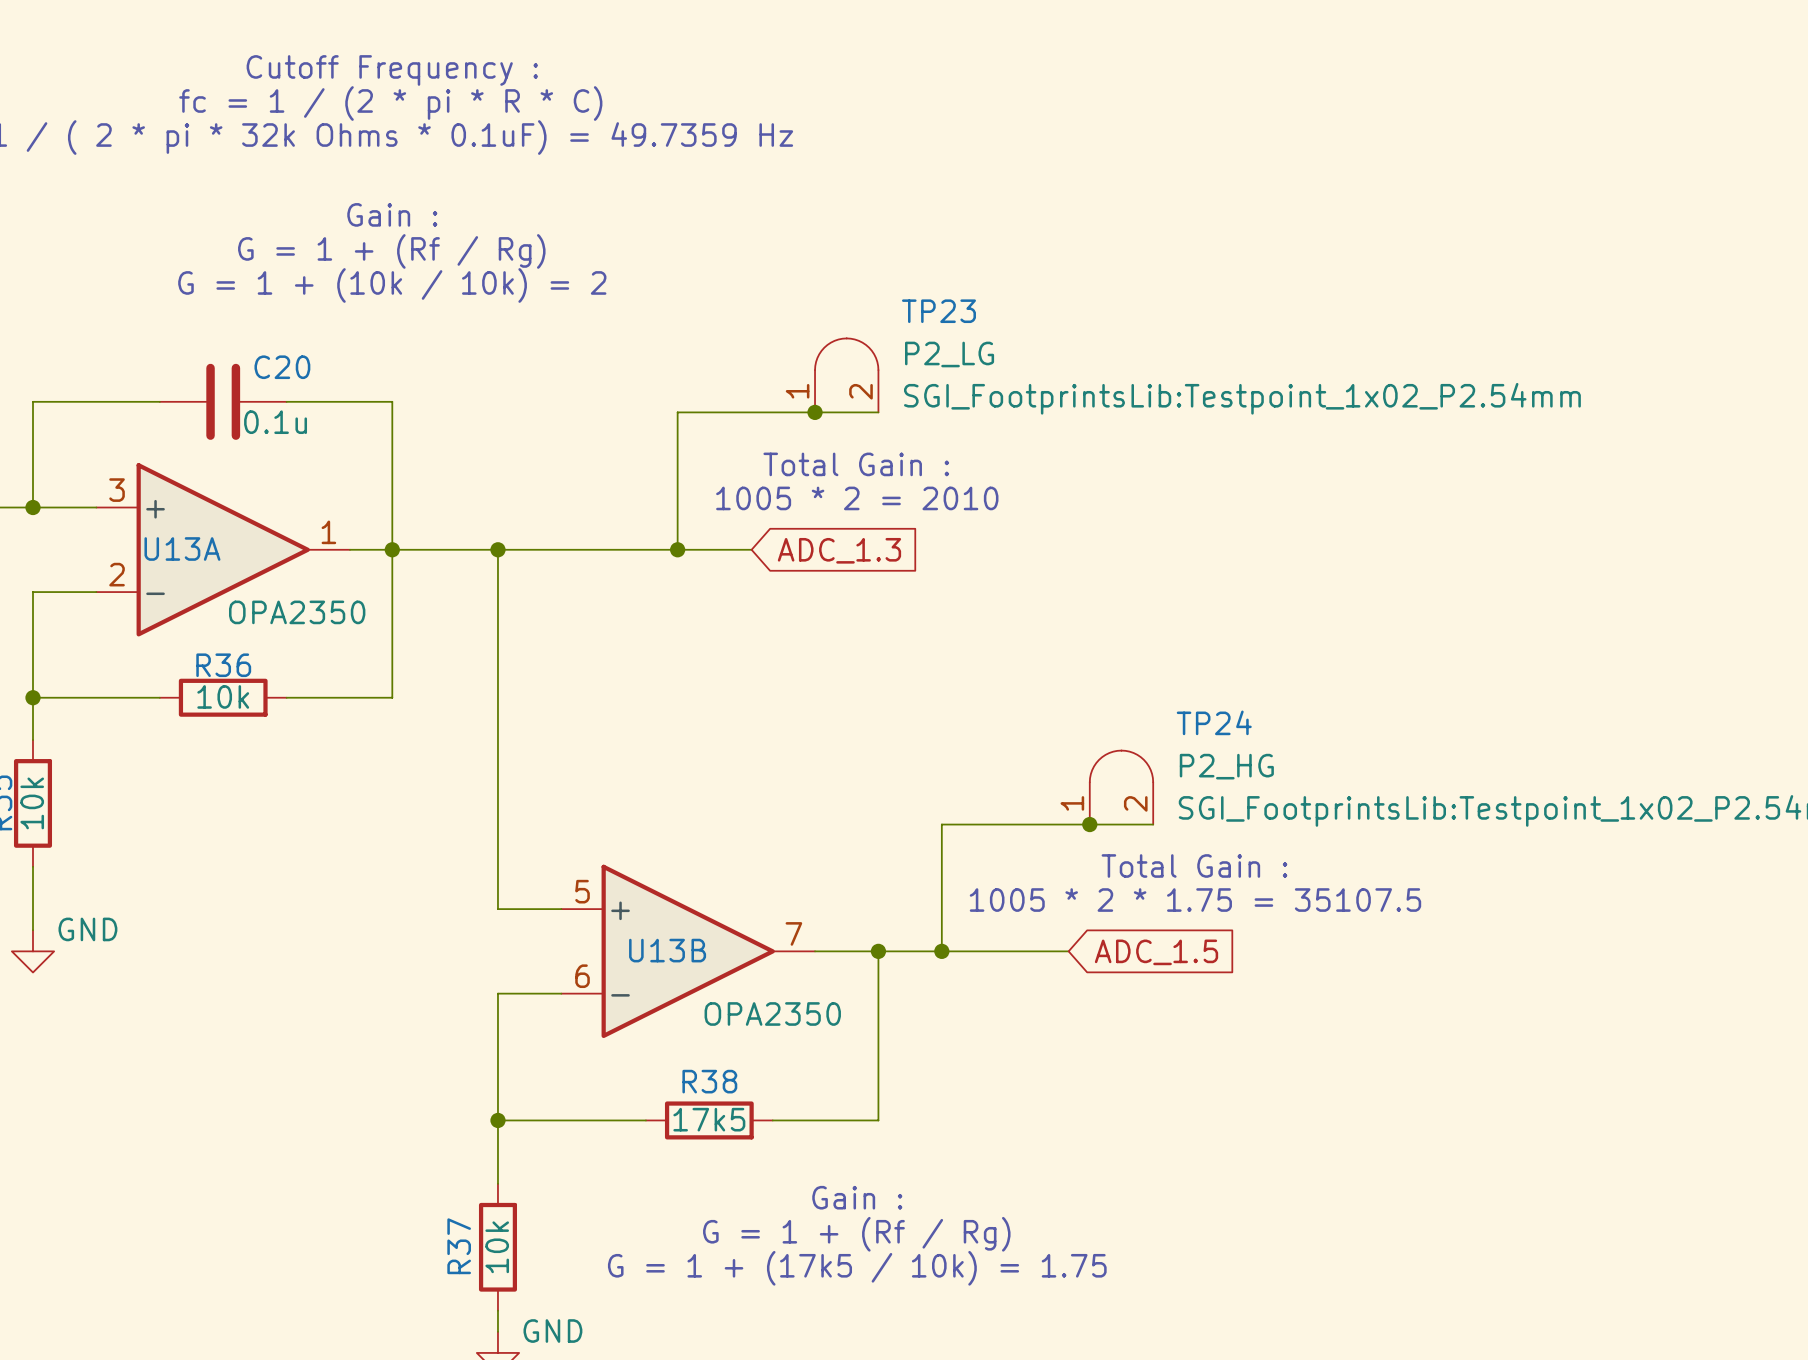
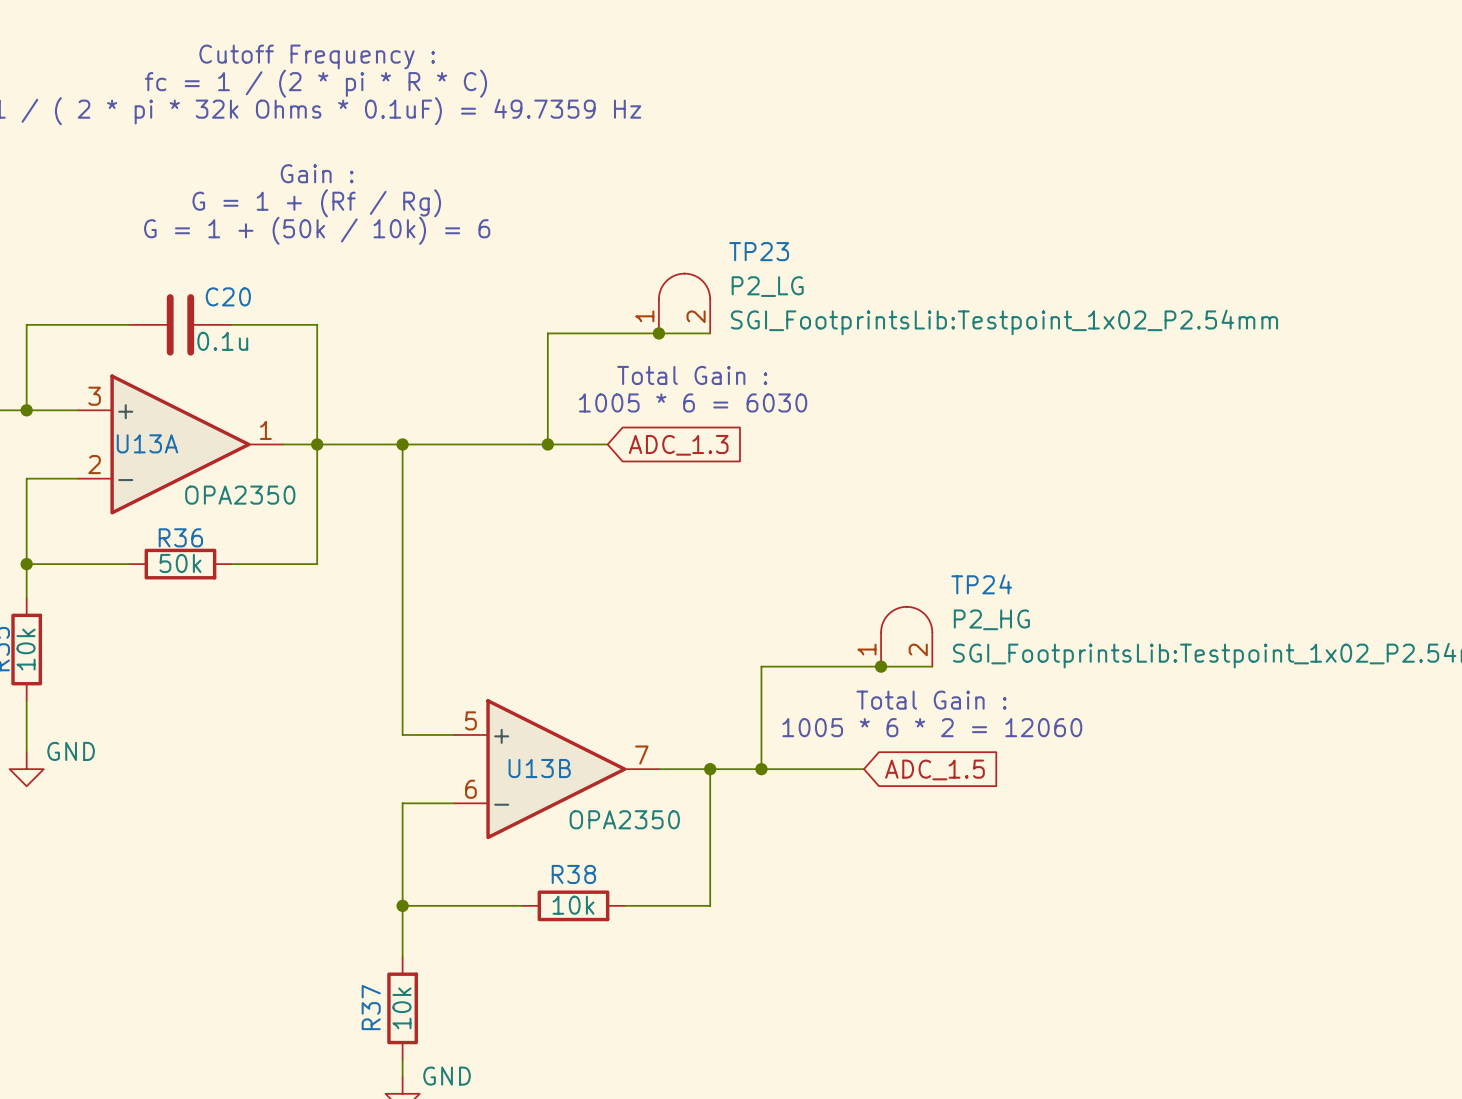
text: G = 1 + (10k / 10k) = 2 (392, 285) -> G = 1 + (50k / 10k) = 6 (317, 230)
text: 1005 * 2 = 2010 (857, 498) -> 1005 * 6 = 6030 (693, 402)
R36 value: 10k (223, 696) -> 50k (180, 563)
text position: Total Gain : (1194, 865) -> Total Gain : (931, 700)
text: 1005 * 2 * 1.75 = 35107.5 (1195, 900) -> 1005 * 6 * 2 = 12060 (932, 727)
R38 value: 17k5 (709, 1119) -> 10k (573, 905)
text: Gain : (857, 1197) -> none
text: G = 1 + (Rf / Rg) (856, 1234) -> none
text: G = 1 + (17k5 / 10k) = 1.75 (857, 1268) -> none

